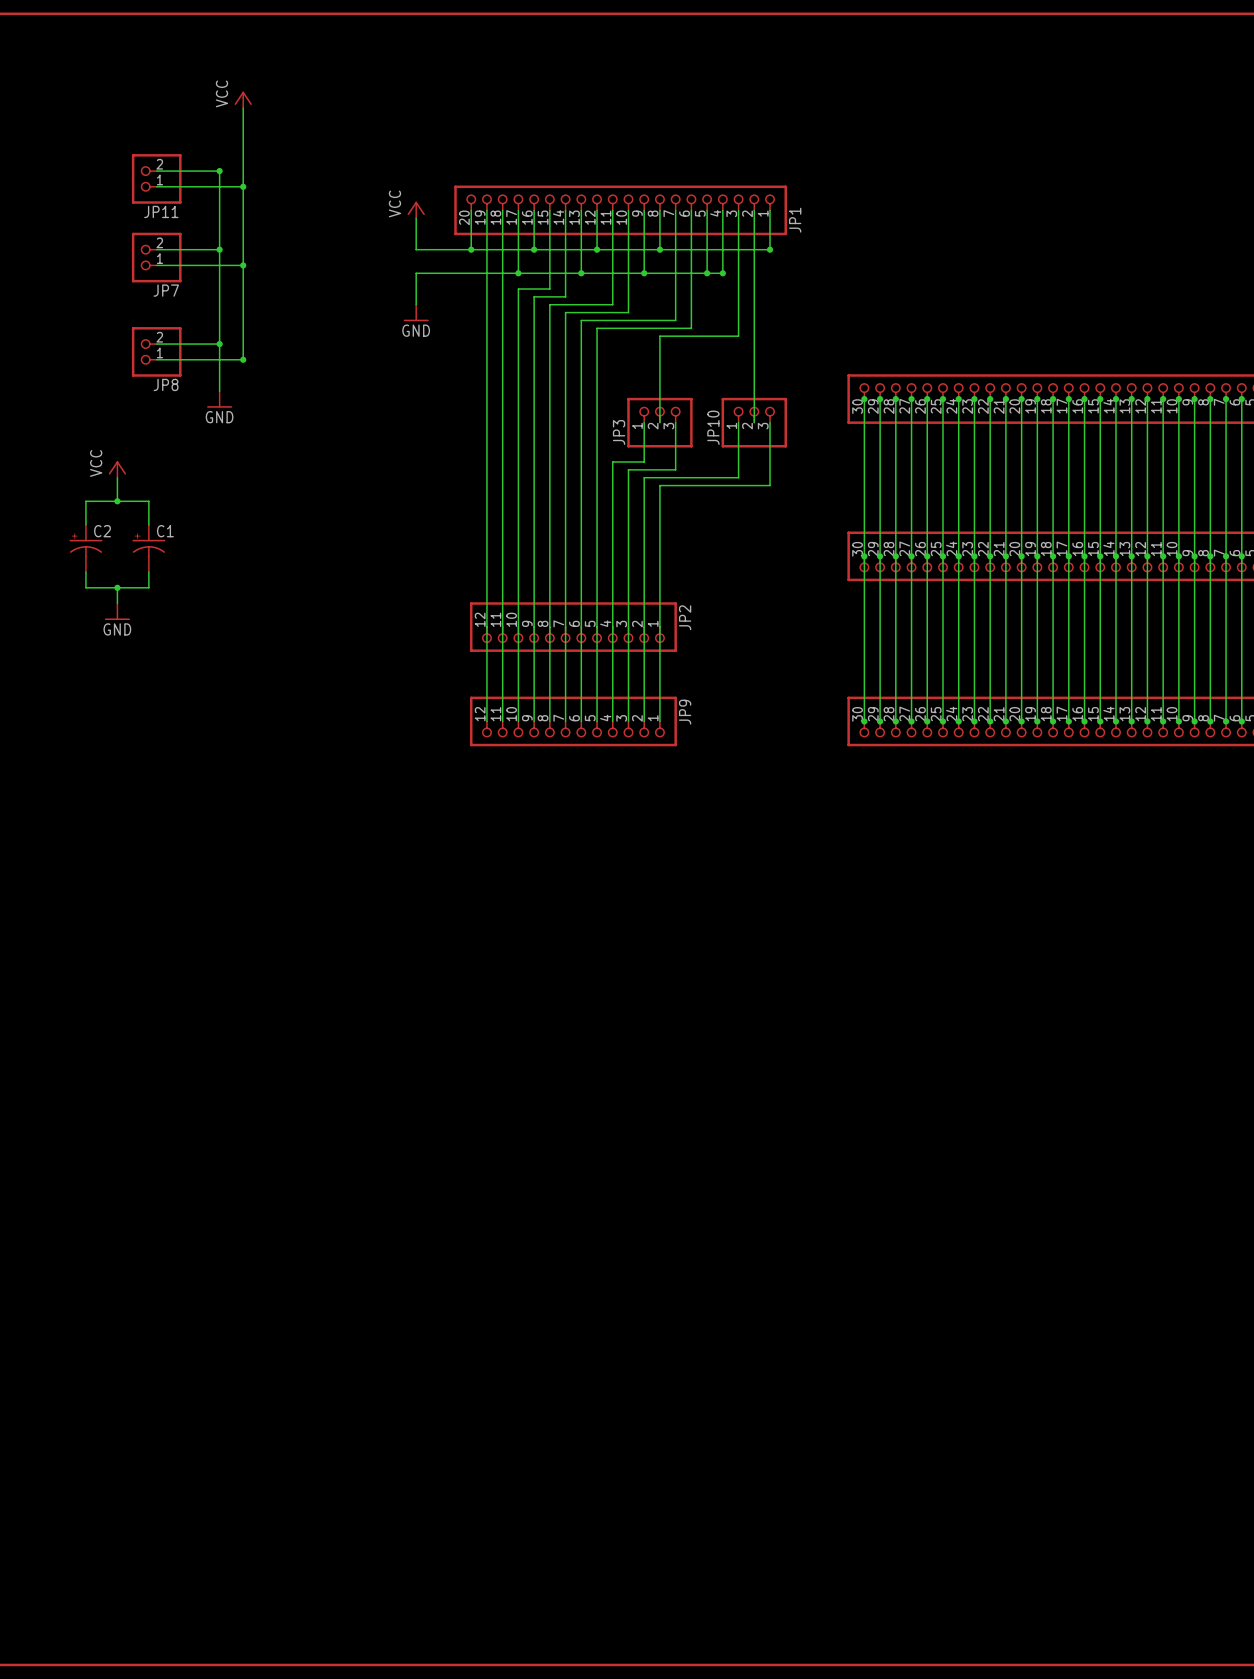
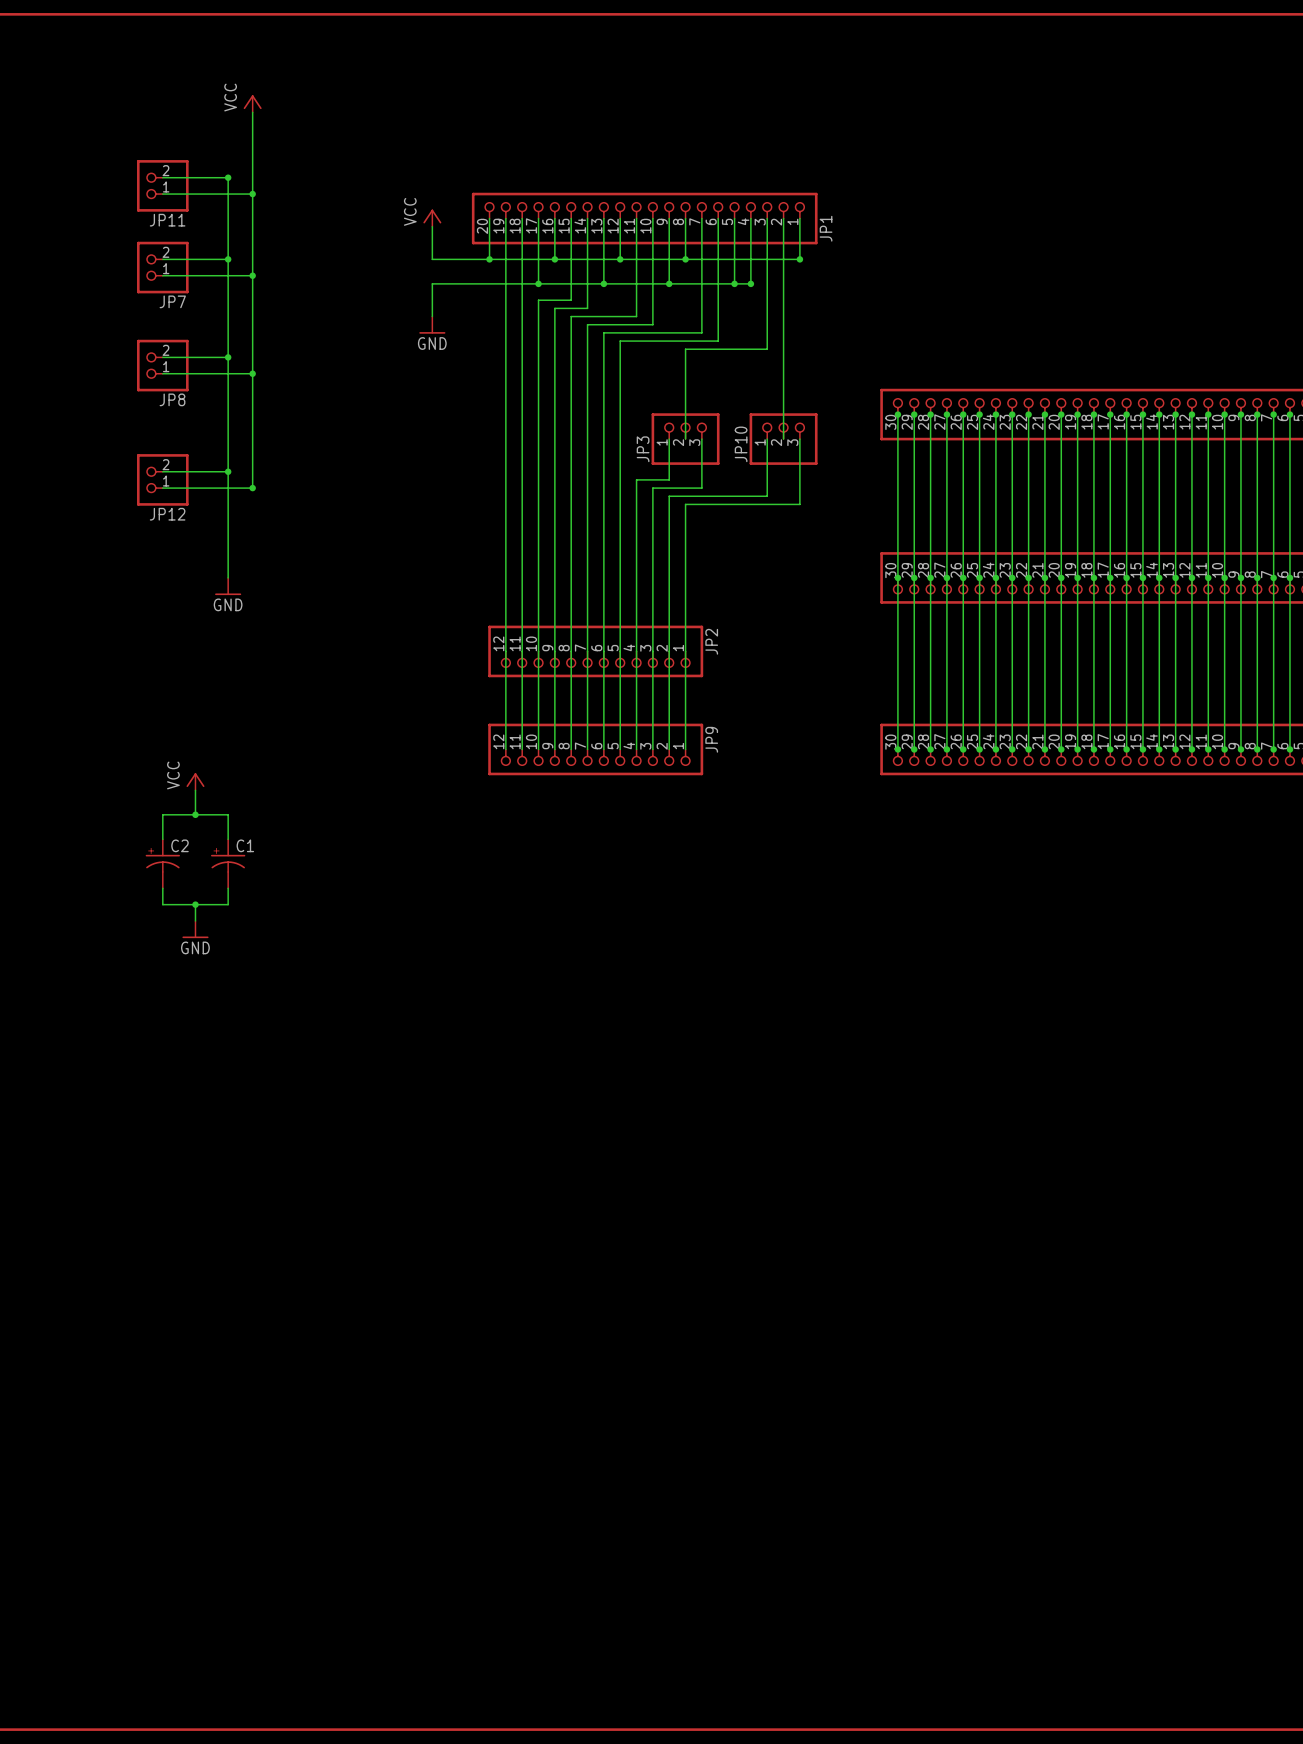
wire: none -> (252, 373) (252, 488) (162, 488)
wire: none -> (228, 406) (228, 577)
power symbol: GND (219, 399) -> none
wire: none -> (162, 471) (228, 471)
junction: none -> (228, 471)
JP12: none -> (162, 479)
power symbol: VCC (117, 469) -> none
junction: none -> (252, 488)
wire: (117, 477) (117, 501) -> none
junction: (117, 501) -> none
wire: (85, 524) (85, 501) (148, 501) (148, 524) -> none
C2 position: (85, 548) -> (162, 863)
C1 position: (148, 548) -> (228, 863)
power symbol: none -> GND (228, 586)
wire: (85, 572) (85, 587) (148, 587) (148, 572) -> none
wire: (117, 587) (117, 603) -> none
junction: (117, 587) -> none
power symbol: GND (117, 611) -> none
power symbol: none -> VCC (195, 781)
wire: none -> (195, 790) (195, 814)
junction: none -> (195, 814)
wire: none -> (162, 839) (162, 814) (228, 814) (228, 839)
wire: none -> (162, 888) (162, 904) (228, 904) (228, 888)
wire: none -> (195, 904) (195, 920)
junction: none -> (195, 904)
power symbol: none -> GND (195, 929)

